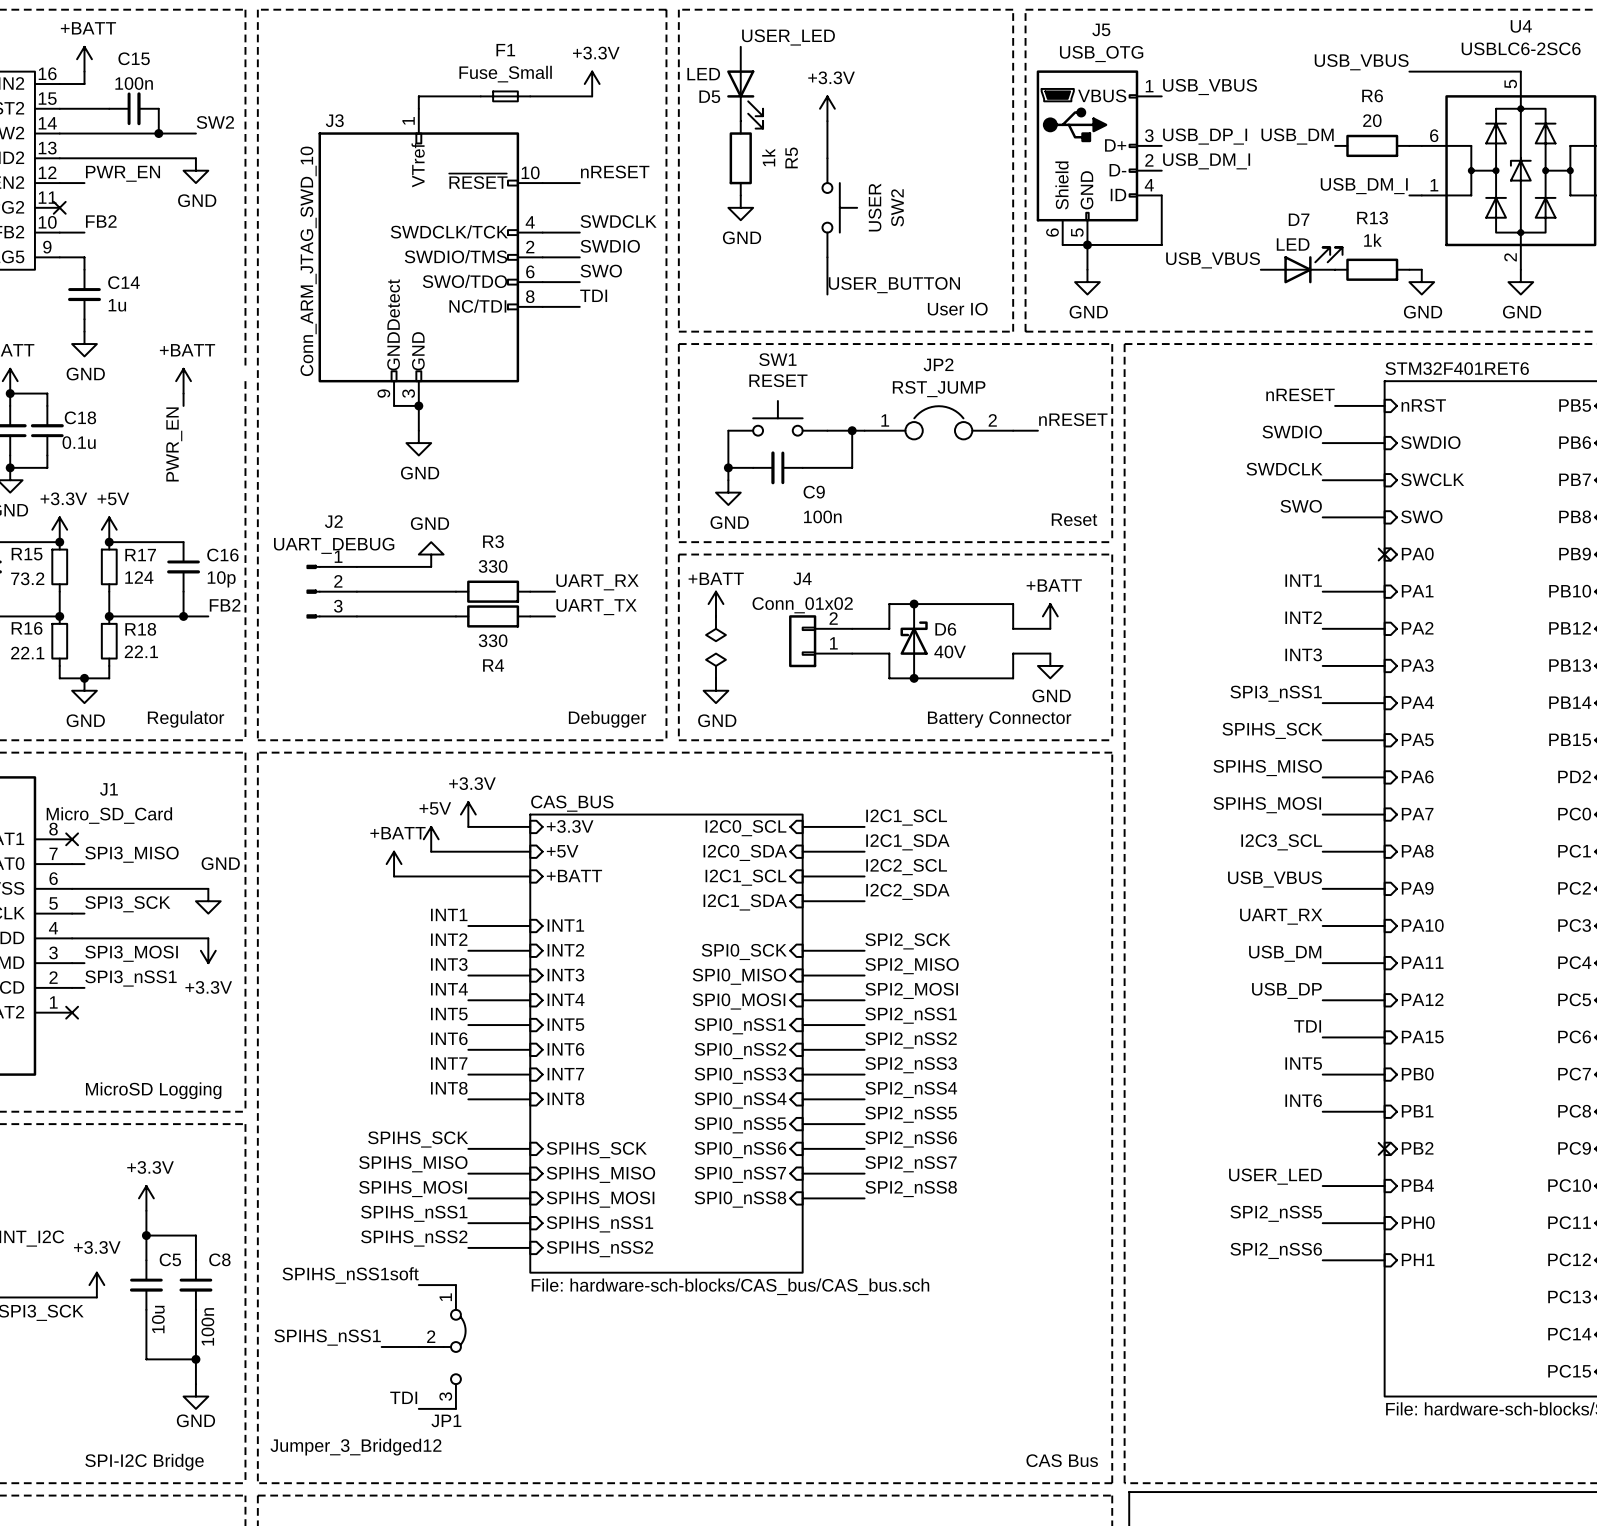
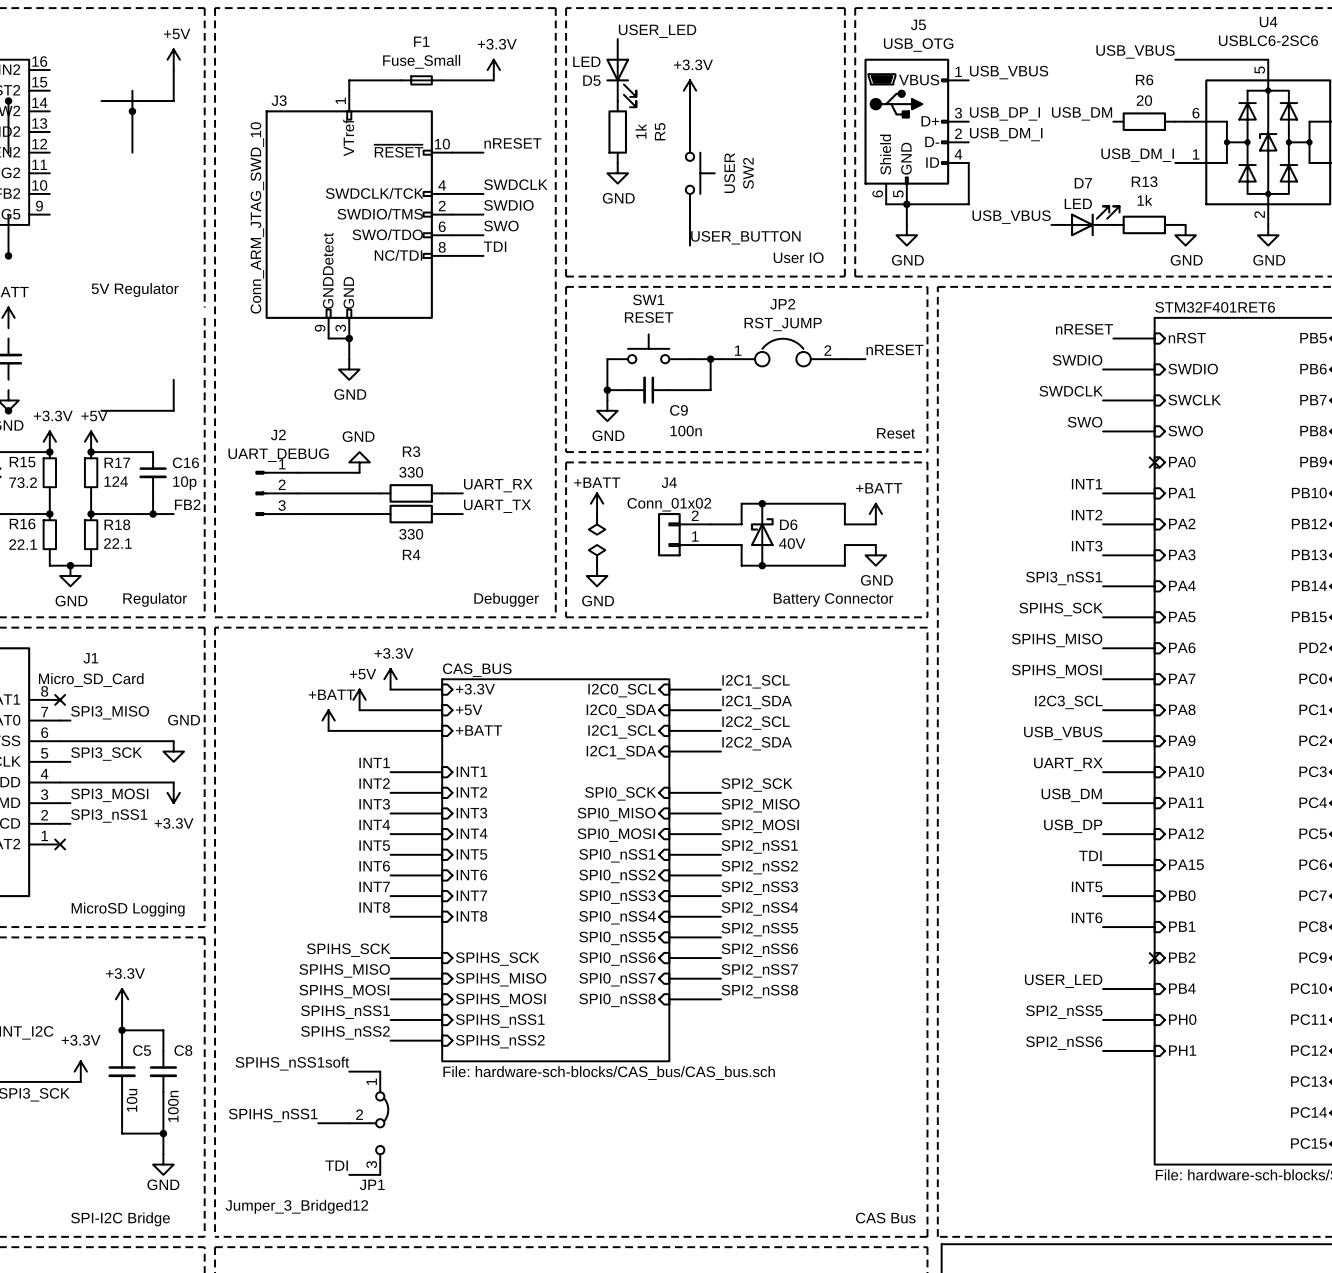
power symbol: +BATT (84, 59) -> none
wire: (84, 71) (84, 84) (59, 84) -> none
power symbol: none -> +5V (173, 59)
wire: none -> (173, 70) (173, 101) (101, 101)
wire: (59, 108) (109, 108) -> none
C15: 100n (134, 108) -> none
wire: none -> (8, 101) (8, 152)
junction: none -> (8, 101)
label: SW2 (215, 122) -> none
wire: (59, 133) (195, 133) -> none
wire: none -> (132, 111) (132, 152)
wire: (59, 158) (195, 158) -> none
power symbol: GND (195, 170) -> none
label: PWR_EN (123, 173) -> none
wire: (59, 183) (84, 183) -> none
no-connect mark: (59, 207) -> none
label: FB2 (101, 221) -> none
wire: (59, 232) (84, 232) -> none
wire: none -> (8, 214) (8, 255)
wire: (59, 257) (84, 257) (84, 269) -> none
C14: 1u (84, 294) -> none
junction: none -> (8, 255)
wire: (84, 319) (84, 331) -> none
power symbol: GND (84, 344) -> none
text: none -> 5V Regulator (135, 290)
power symbol: +BATT (183, 381) -> none
junction: (10, 393) -> none
wire: (183, 393) (183, 405) -> none
wire: (10, 405) (10, 393) (47, 393) (47, 405) -> none
C18: 0.1u (47, 430) -> none
label: PWR_EN (174, 444) -> none
wire: (10, 455) (10, 467) (47, 467) (47, 455) -> none
wire: none -> (173, 379) (173, 410) (101, 410)
junction position: (10, 467) -> (8, 410)

